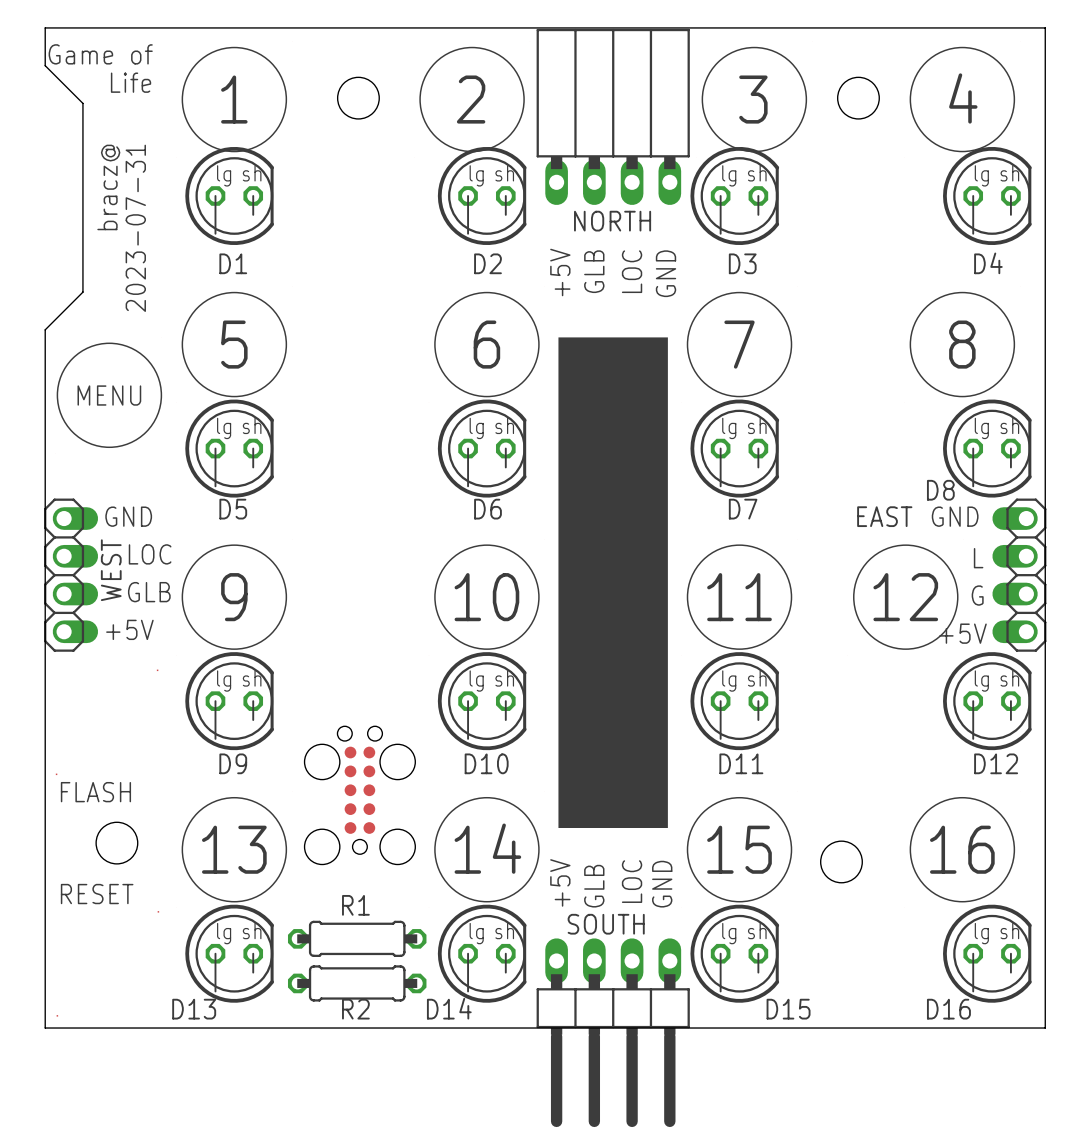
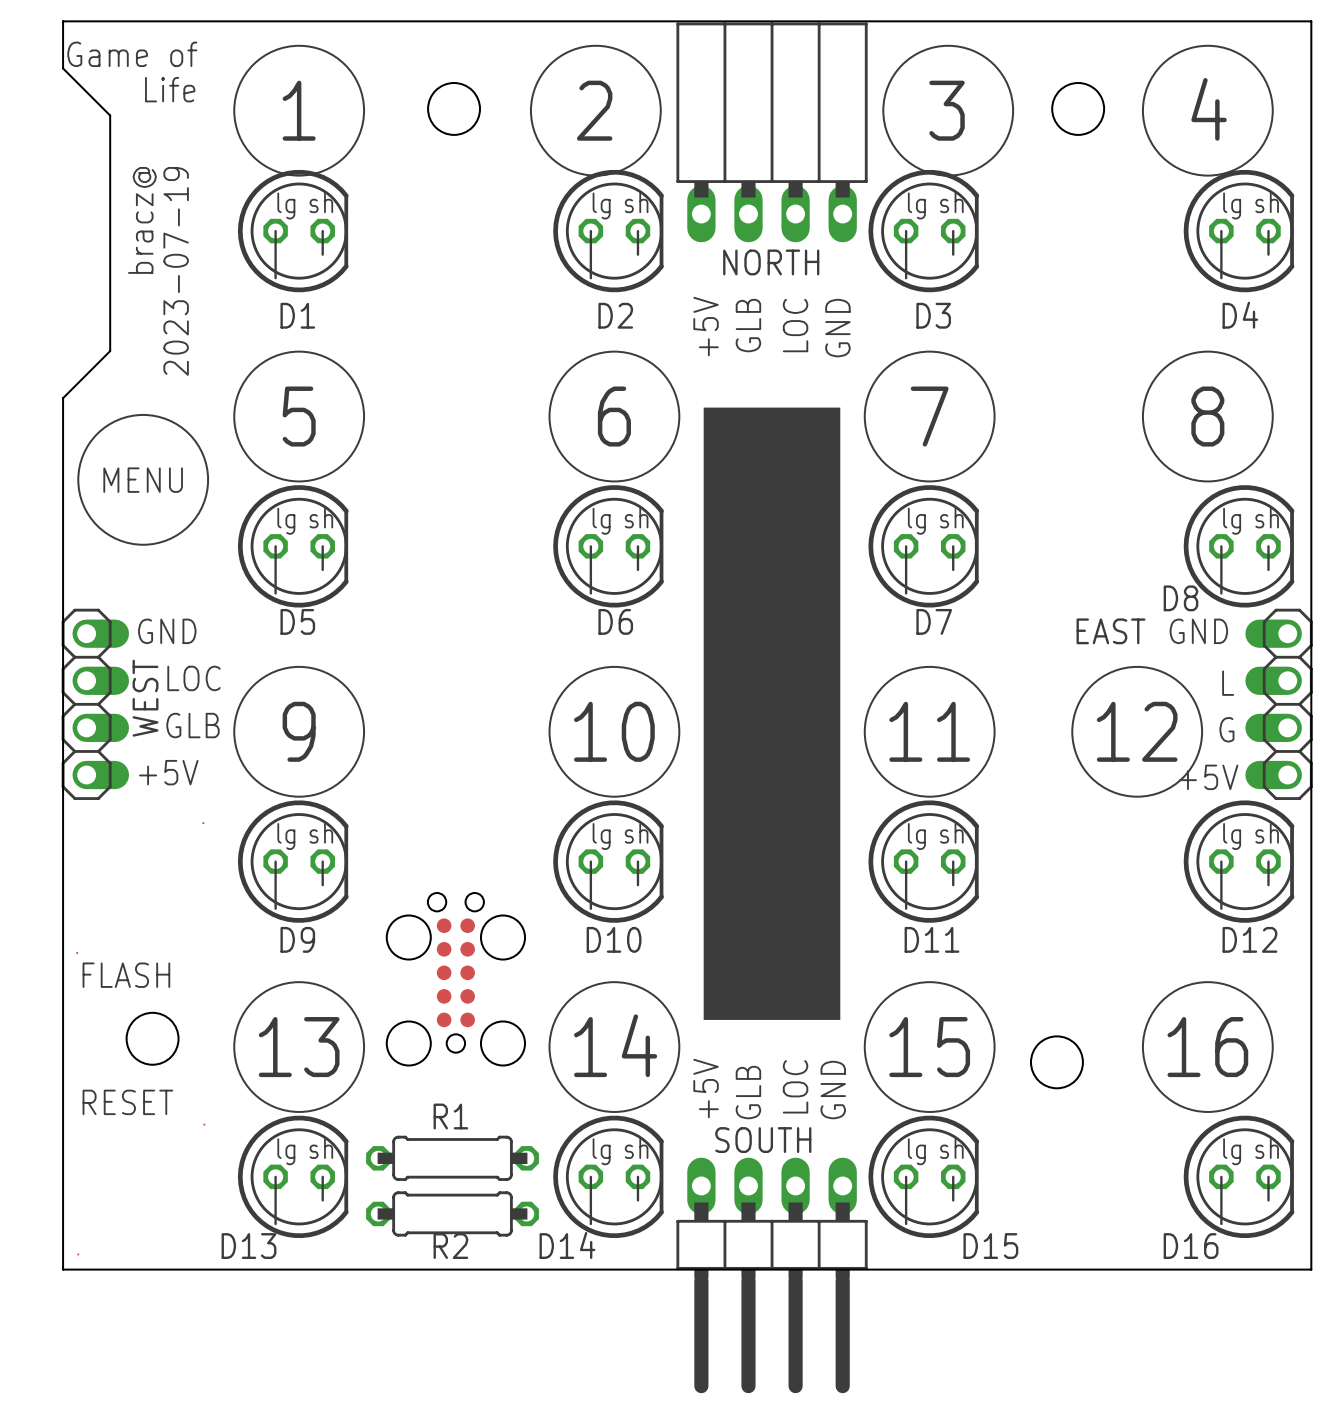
text: 2023-07-31 (135, 228) -> 2023-07-19 (176, 271)

